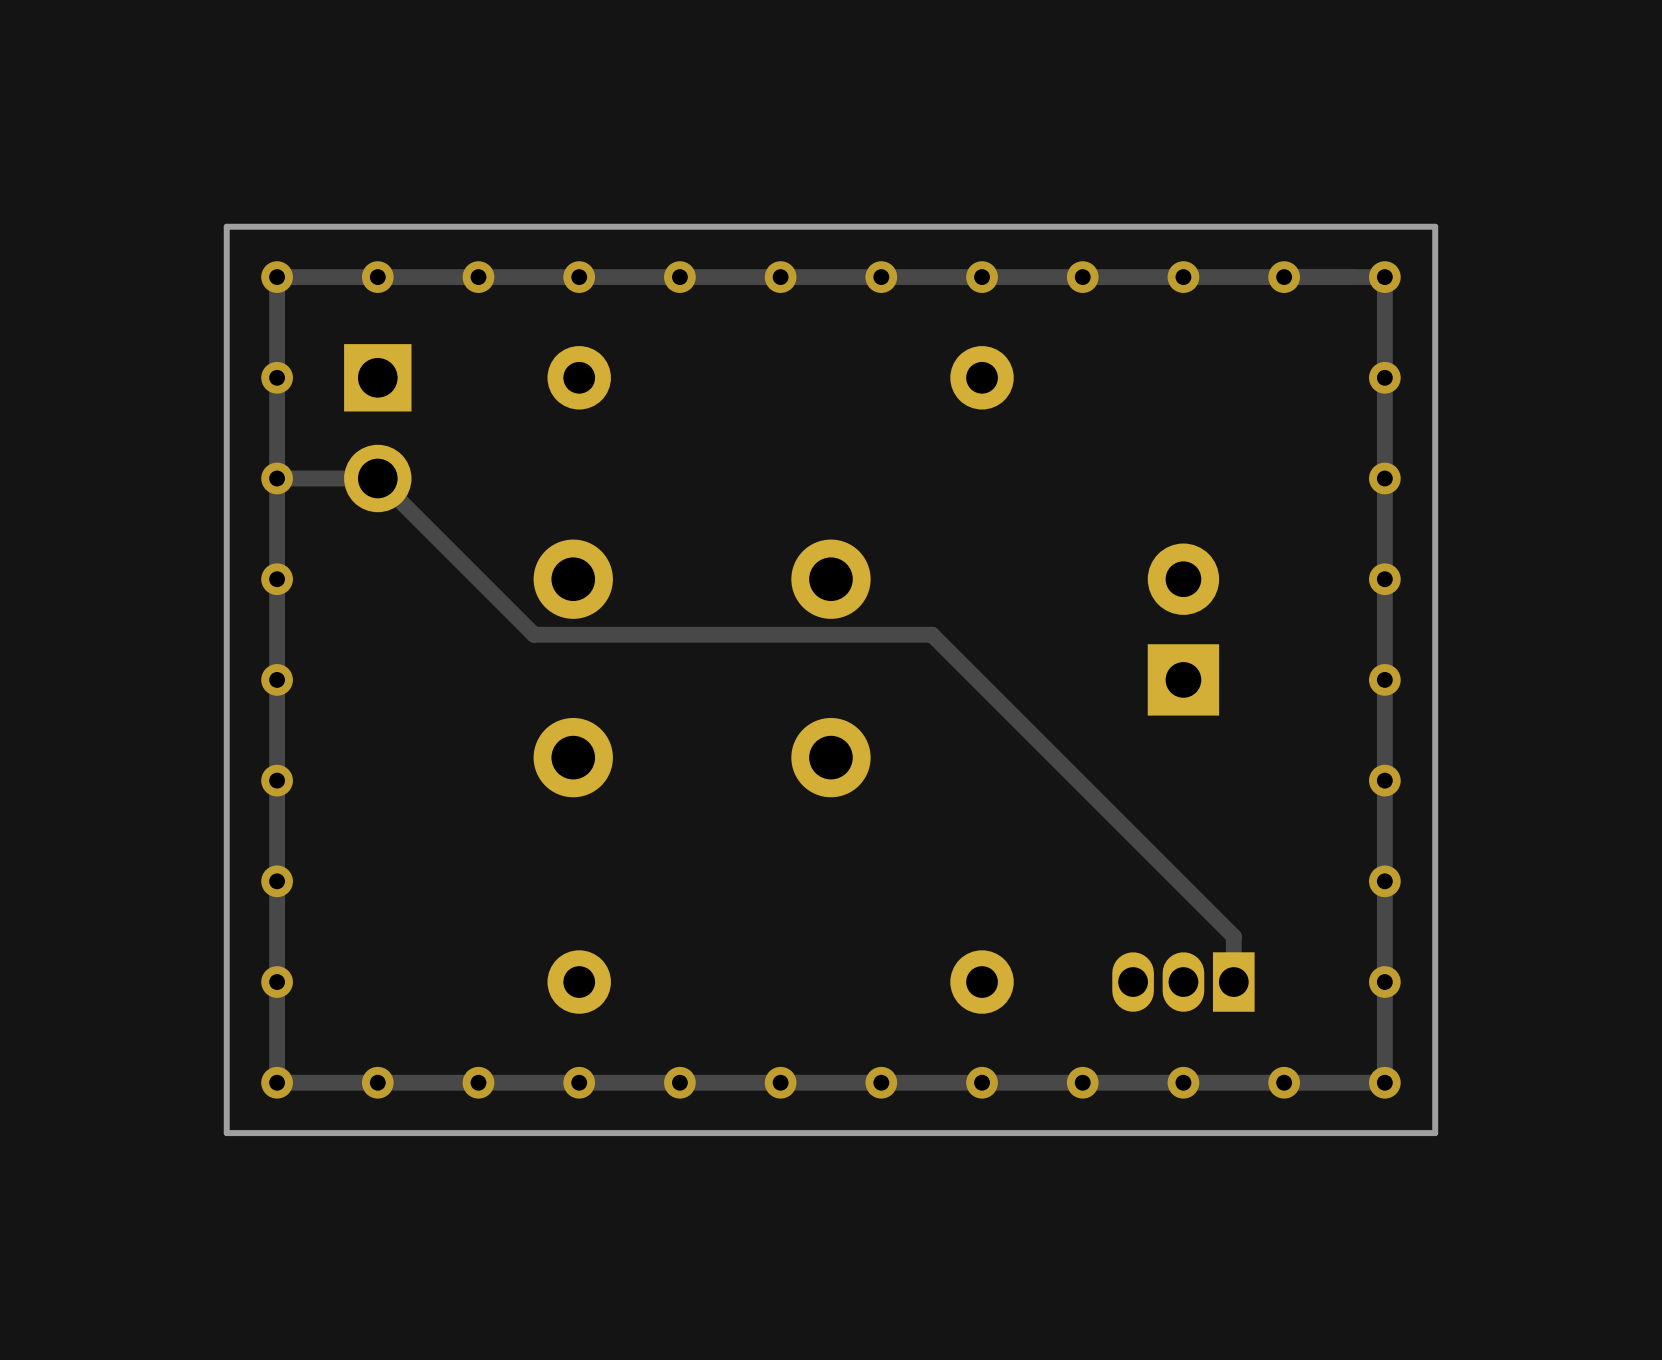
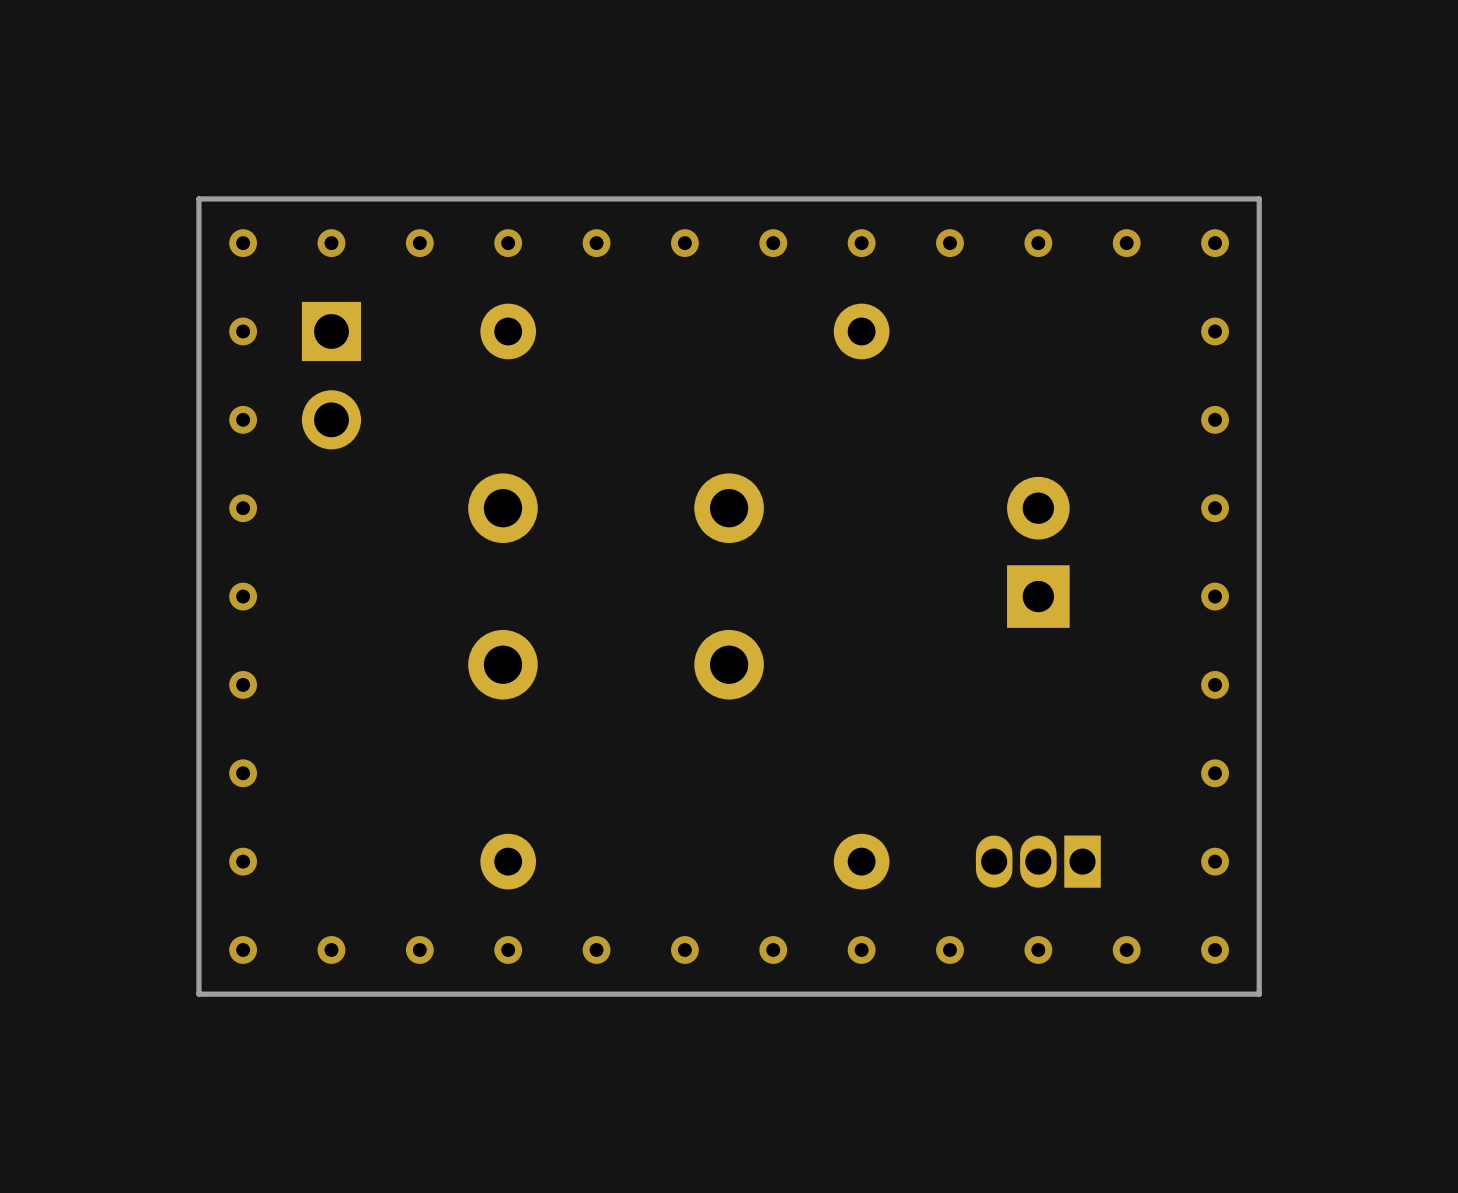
track: (1384, 277) (277, 277) (277, 1082) (1384, 1082) (1384, 277) -> none
track: (277, 478) (377, 478) (534, 634) (932, 634) (1233, 936) (1233, 982) -> none

